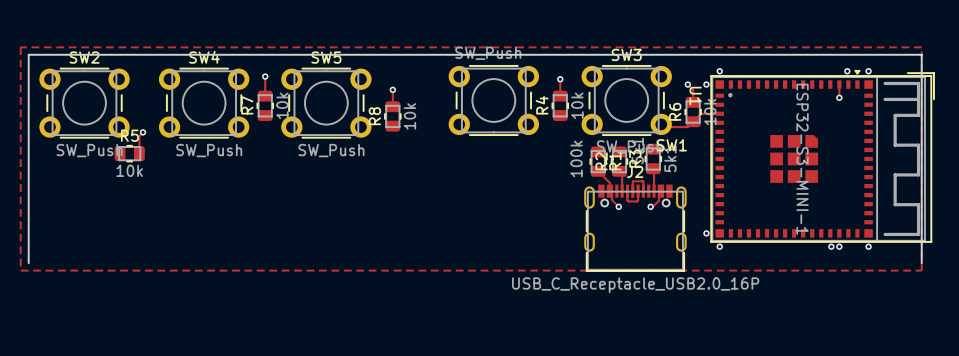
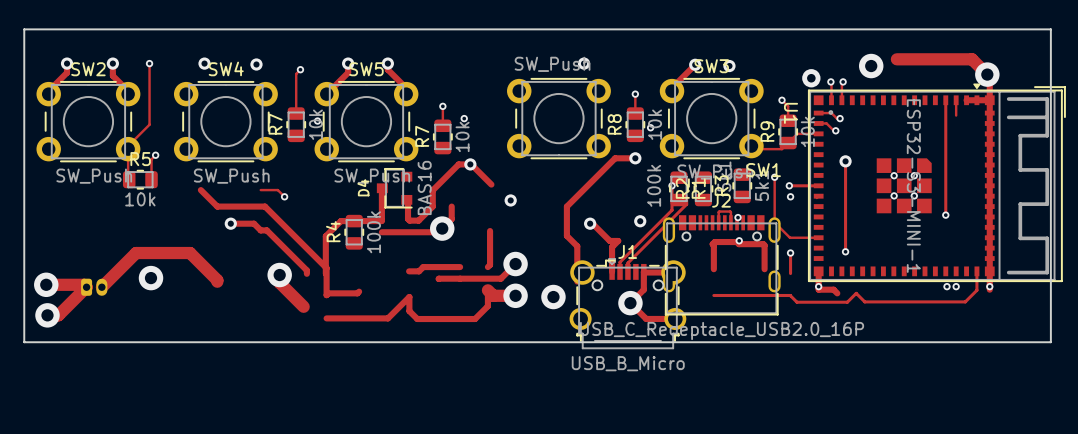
zone outline: (20, 47) (20, 270) (921, 270) (921, 47) (20, 47) -> none
track: none -> (896, 59) (972, 59) (989, 77) (989, 289)
track: none -> (67, 63) (67, 72) (48, 91)
via: none -> (67, 63)
track: none -> (112, 63) (112, 75) (128, 91)
via: none -> (112, 63)
track: none -> (149, 63) (149, 124) (128, 146) (129, 179)
via: none -> (149, 63)
via: none -> (204, 63)
track: none -> (348, 63) (348, 72) (329, 91)
via: none -> (348, 63)
track: none -> (387, 63) (387, 69) (409, 91)
via: none -> (387, 63)
via: none -> (584, 63)
via: none -> (256, 64)
track: none -> (695, 64) (672, 88) (672, 91)
via: none -> (695, 64)
board edge: (28, 54) (921, 54) -> (24, 66) (24, 29) (1050, 29) (1050, 66)
via: none -> (729, 66)
via: none -> (871, 66)
track: none -> (300, 69) (296, 73) (296, 91)
via: none -> (300, 69)
via size: [716, 68, 723, 75] -> [802, 69, 821, 88]
track: none -> (830, 81) (831, 100)
via: none -> (830, 81)
track: none -> (843, 81) (841, 100)
via: none -> (843, 81)
via size: [865, 68, 872, 75] -> [975, 62, 1000, 87]
via: (847, 71) -> none
via: (265, 76) -> none
via: (706, 84) -> none
track: none -> (945, 100) (945, 215)
track: none -> (966, 100) (989, 100)
track: none -> (818, 113) (831, 113) (837, 118) (840, 118)
via: (839, 97) -> none
via: none -> (464, 118)
via: none -> (840, 118)
via: none -> (317, 121)
track: none -> (818, 123) (826, 123) (835, 130)
R4 name: R4 (542, 105) -> R8 (614, 124)
via: none -> (650, 127)
R6 name: R6 (675, 111) -> R9 (767, 131)
via: none -> (835, 130)
R8 name: R8 (374, 116) -> R7 (422, 136)
track: none -> (635, 158) (615, 158) (566, 206) (566, 235) (577, 246) (577, 281)
via: none -> (635, 158)
track: none -> (845, 161) (845, 251)
via: none -> (845, 161)
via: none -> (470, 164)
via: none -> (894, 175)
via: none -> (914, 175)
track: none -> (774, 177) (774, 222) (789, 237) (818, 237)
via: none -> (774, 177)
track: none -> (491, 184) (471, 164) (458, 164) (432, 190) (432, 206) (418, 220) (408, 218) (406, 199)
track: none -> (672, 185) (672, 210) (620, 262) (620, 271)
via: none -> (672, 185)
track: none -> (789, 185) (818, 185)
via: none -> (789, 185)
track: none -> (382, 188) (381, 221) (340, 221) (325, 236) (325, 273)
D4: none -> BAS16 (394, 188)
track: none -> (200, 190) (217, 206) (265, 206) (326, 268) (326, 295) (328, 293) (357, 293) (359, 291)
track: none -> (260, 190) (277, 190) (284, 196)
via: none -> (894, 195)
via: none -> (914, 195)
via: none -> (284, 196)
track: none -> (686, 196) (686, 204) (627, 263) (627, 271)
track: (653, 168) (654, 191) -> none
via: none -> (790, 196)
via: none -> (510, 200)
track: (598, 171) (609, 183) (612, 200) (618, 206) -> none
track: (619, 171) (622, 173) (622, 191) -> none
track: none -> (451, 206) (451, 219) (438, 232) (381, 232)
via: none -> (945, 215)
via: none -> (738, 217)
via: none -> (640, 221)
track: none -> (230, 223) (254, 223) (260, 230) (266, 230) (306, 270) (306, 273)
via: none -> (230, 223)
track: none -> (590, 223) (592, 223) (609, 240) (618, 240) (612, 247) (612, 271)
via: none -> (590, 223)
track: (627, 191) (628, 201) (638, 200) (638, 191) -> none
track: (660, 191) (658, 193) (658, 200) (650, 206) -> none
via: none -> (442, 228)
track: none -> (490, 231) (490, 264) (487, 267)
R4: none -> 100k (354, 232)
via: (618, 206) -> none
via: none -> (845, 251)
track: none -> (790, 253) (790, 273)
track: none -> (515, 264) (500, 278) (438, 278)
via: none -> (515, 264)
track: none -> (460, 267) (423, 267) (419, 271) (409, 271)
track: none -> (713, 269) (712, 244) (714, 242) (763, 244) (764, 269)
via position: (706, 233) -> (790, 253)
track: none -> (818, 271) (818, 289) (833, 289) (837, 293)
track: none -> (976, 271) (976, 290) (965, 301) (864, 301) (856, 293) (847, 302) (796, 302) (790, 295) (713, 295)
track: none -> (673, 272) (643, 271) (643, 289) (630, 303) (646, 318) (675, 318)
track: none -> (279, 275) (279, 282) (303, 306)
via: none -> (279, 275)
via: none -> (151, 278)
track: none -> (217, 281) (190, 253) (136, 253) (101, 287)
track: none -> (46, 284) (84, 284) (86, 287) (58, 315) (47, 315)
via: none -> (46, 284)
part: none -> (94, 287)
track: none -> (515, 295) (493, 295) (487, 290) (487, 306) (475, 319) (417, 319) (409, 311) (409, 297) (388, 318) (326, 318)
via: none -> (515, 295)
via: none -> (553, 297)
J1: none -> USB_B_Micro (627, 303)
via: none -> (630, 303)
board edge: none -> (24, 305) (24, 342) (1050, 342) (1050, 305)
via: none -> (47, 315)

